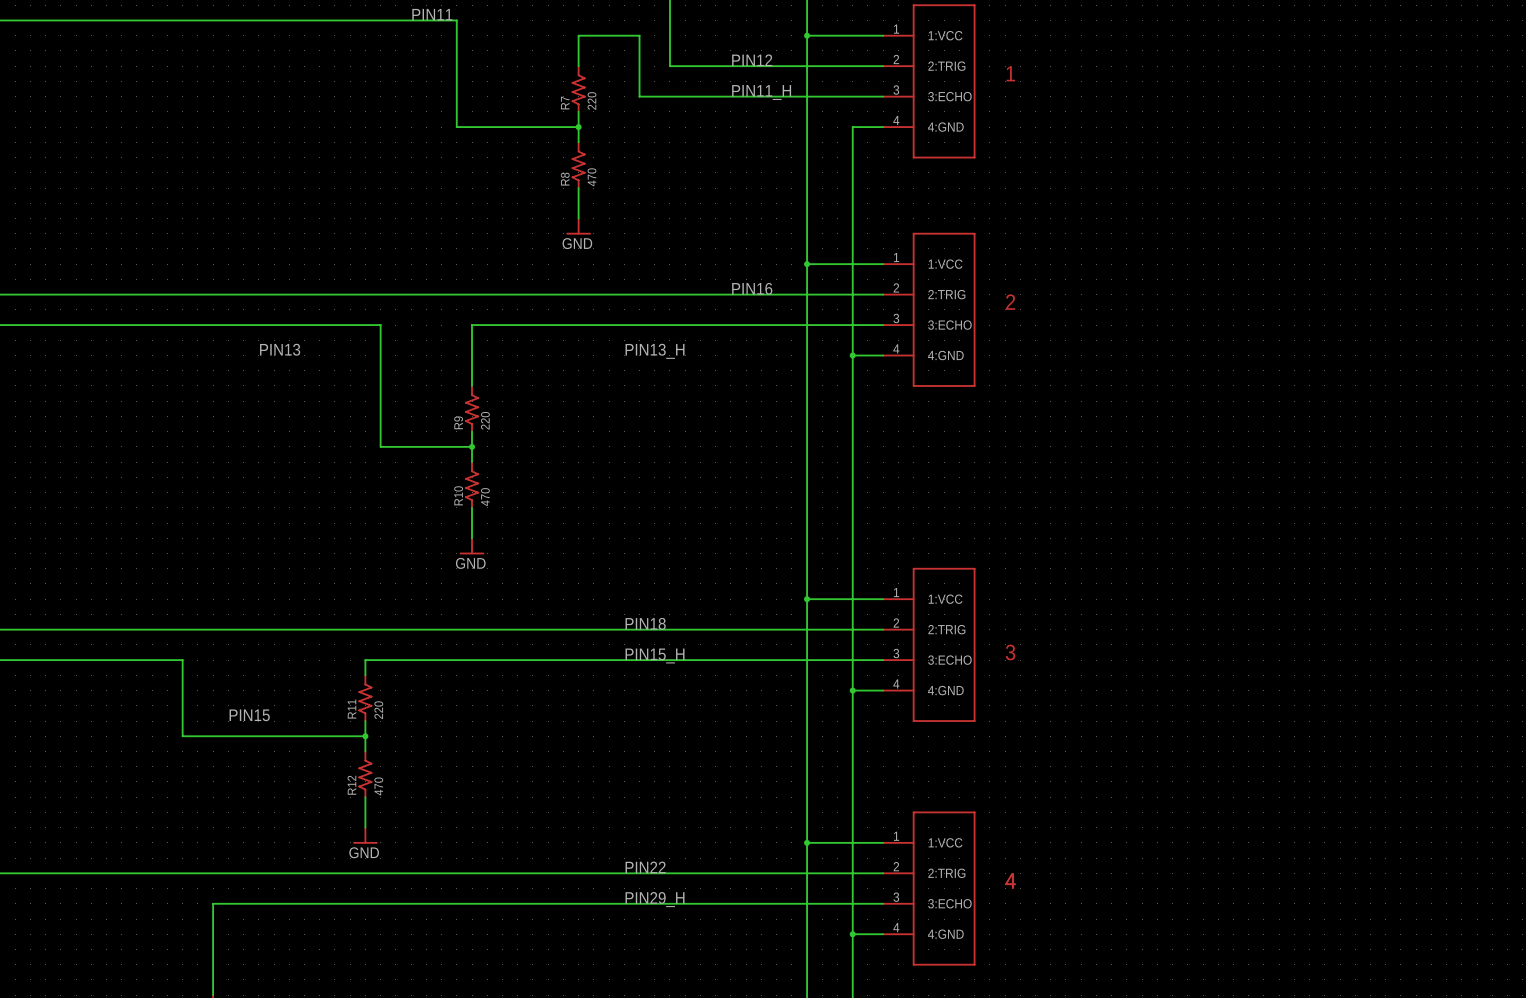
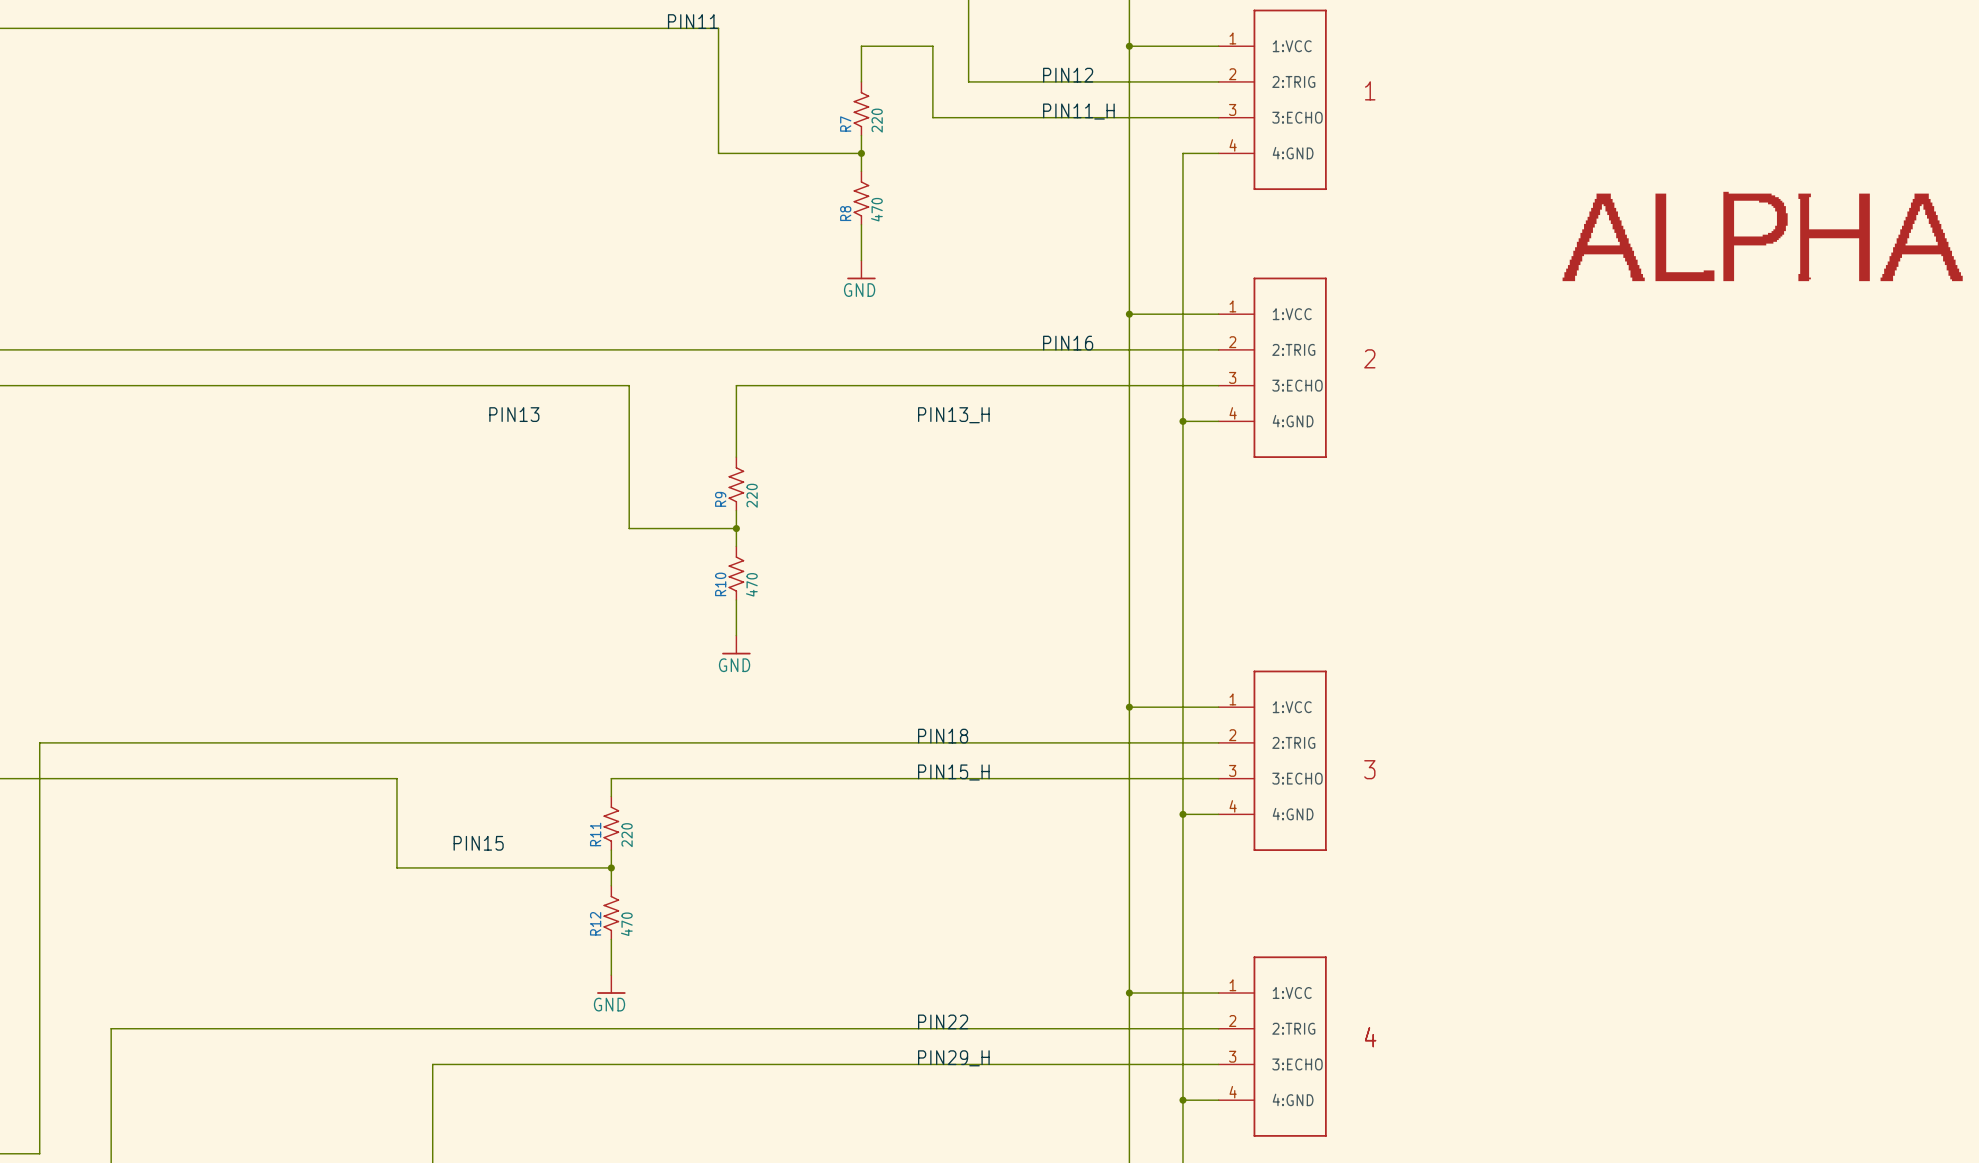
drawing: none -> [1723, 191, 1788, 282]
drawing: none -> [1562, 193, 1645, 282]
drawing: none -> [1655, 193, 1715, 282]
drawing: none -> [1798, 193, 1870, 282]
drawing: none -> [1880, 193, 1963, 282]

